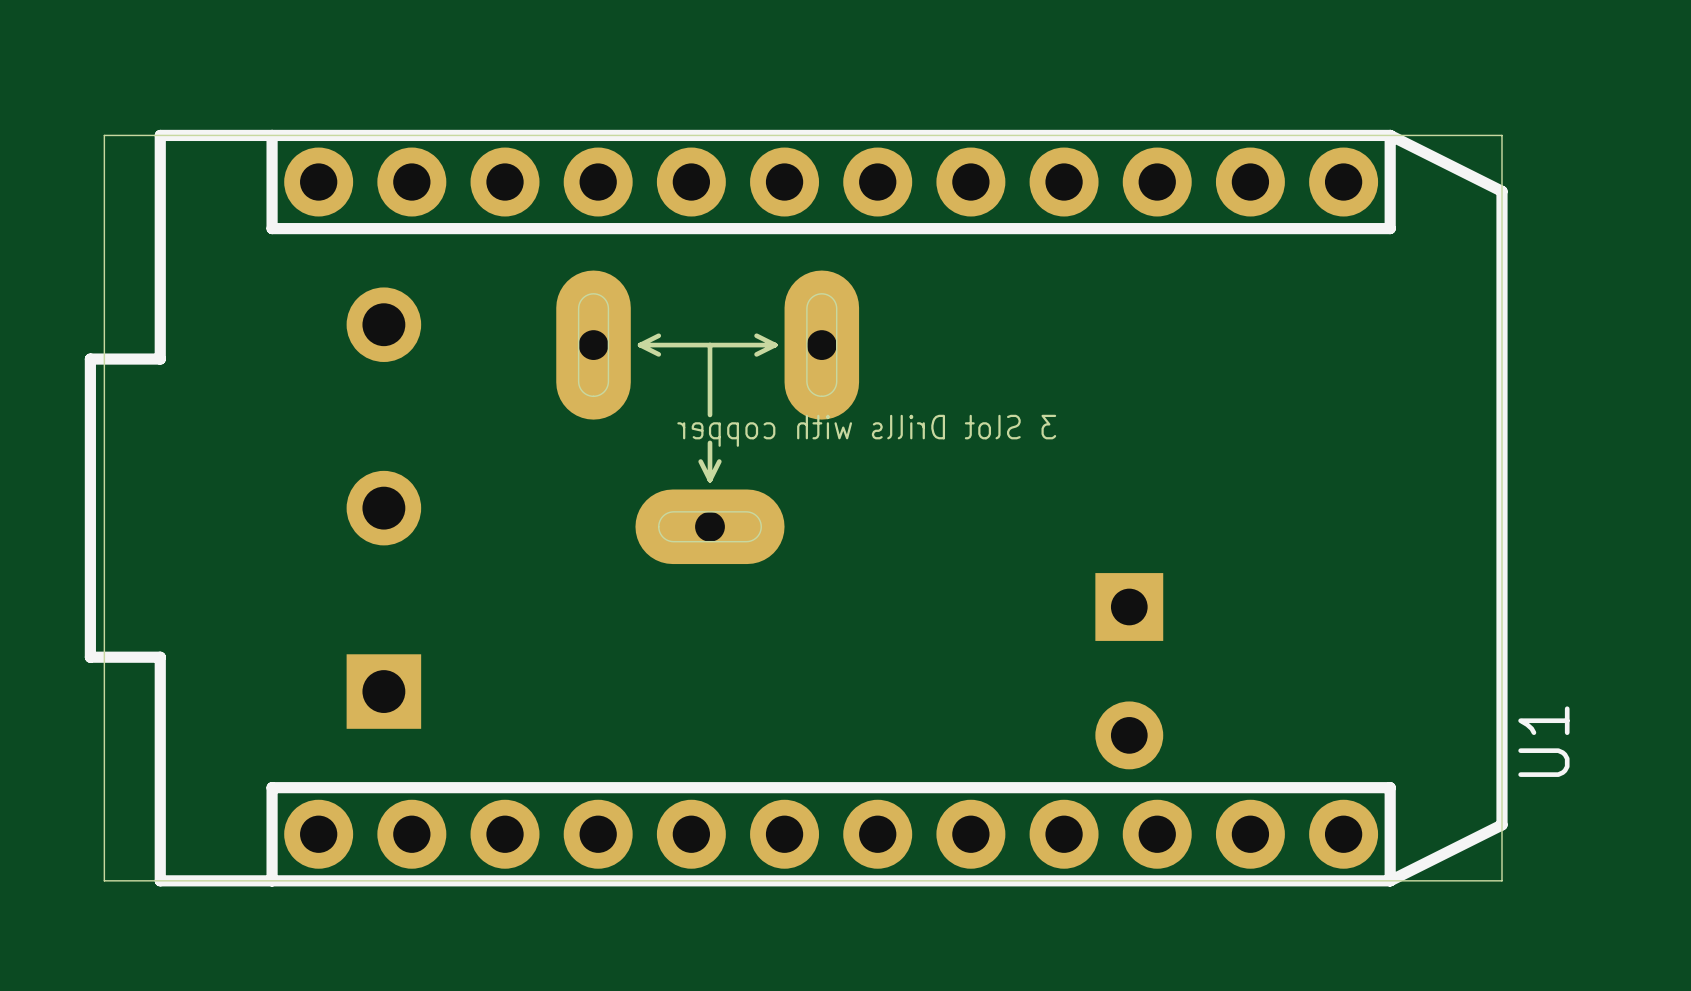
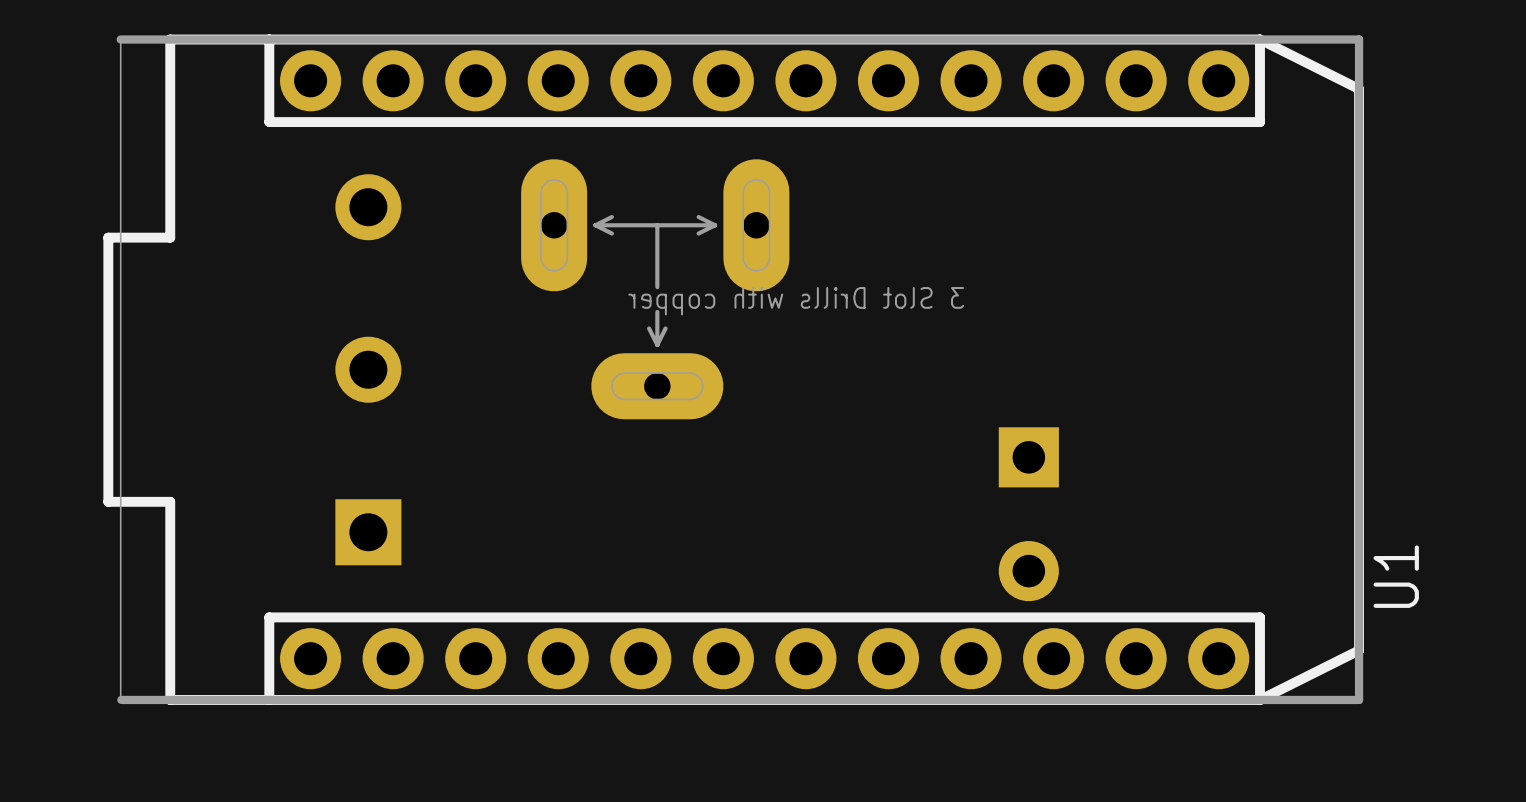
board edge width: thin (104, 135) (1501, 135) (1501, 880) (104, 880) -> thick (120, 39) (1359, 39) (1359, 699) (120, 699)

